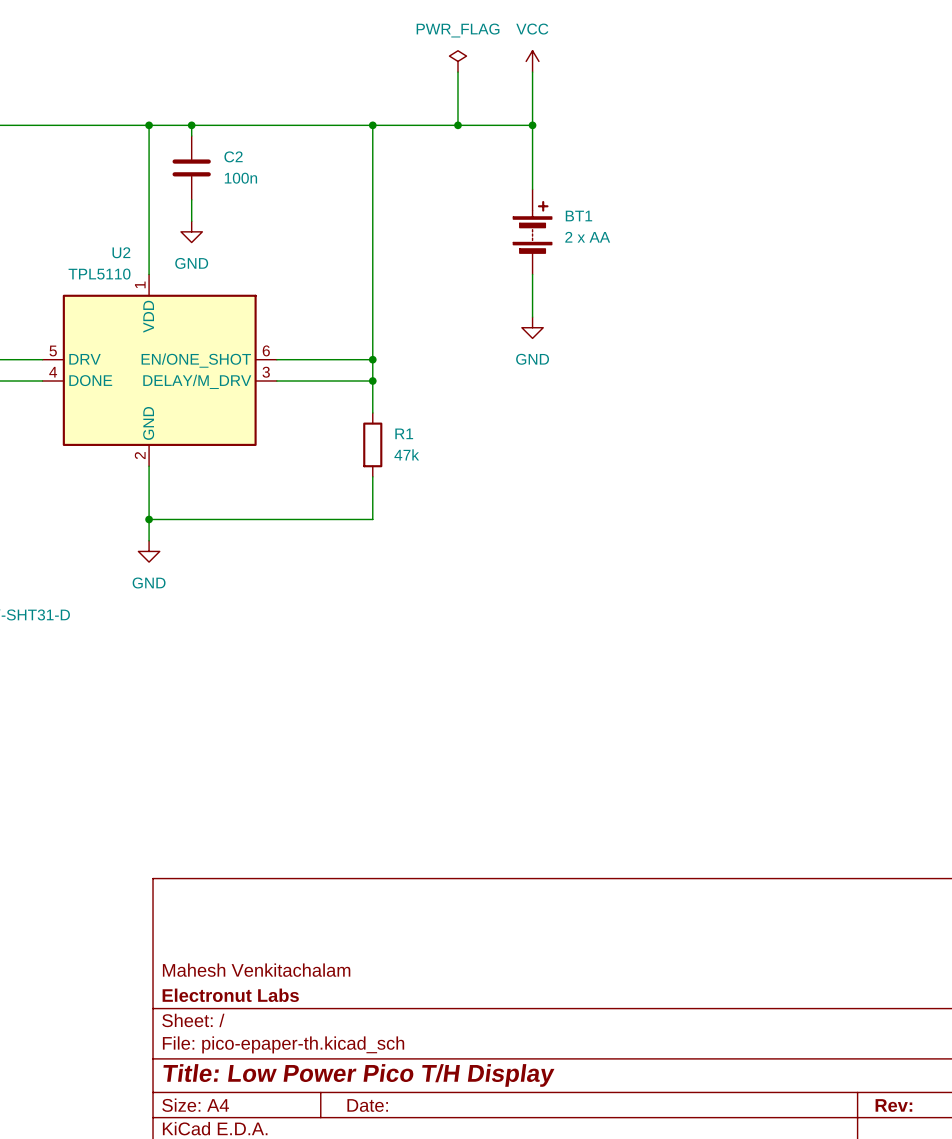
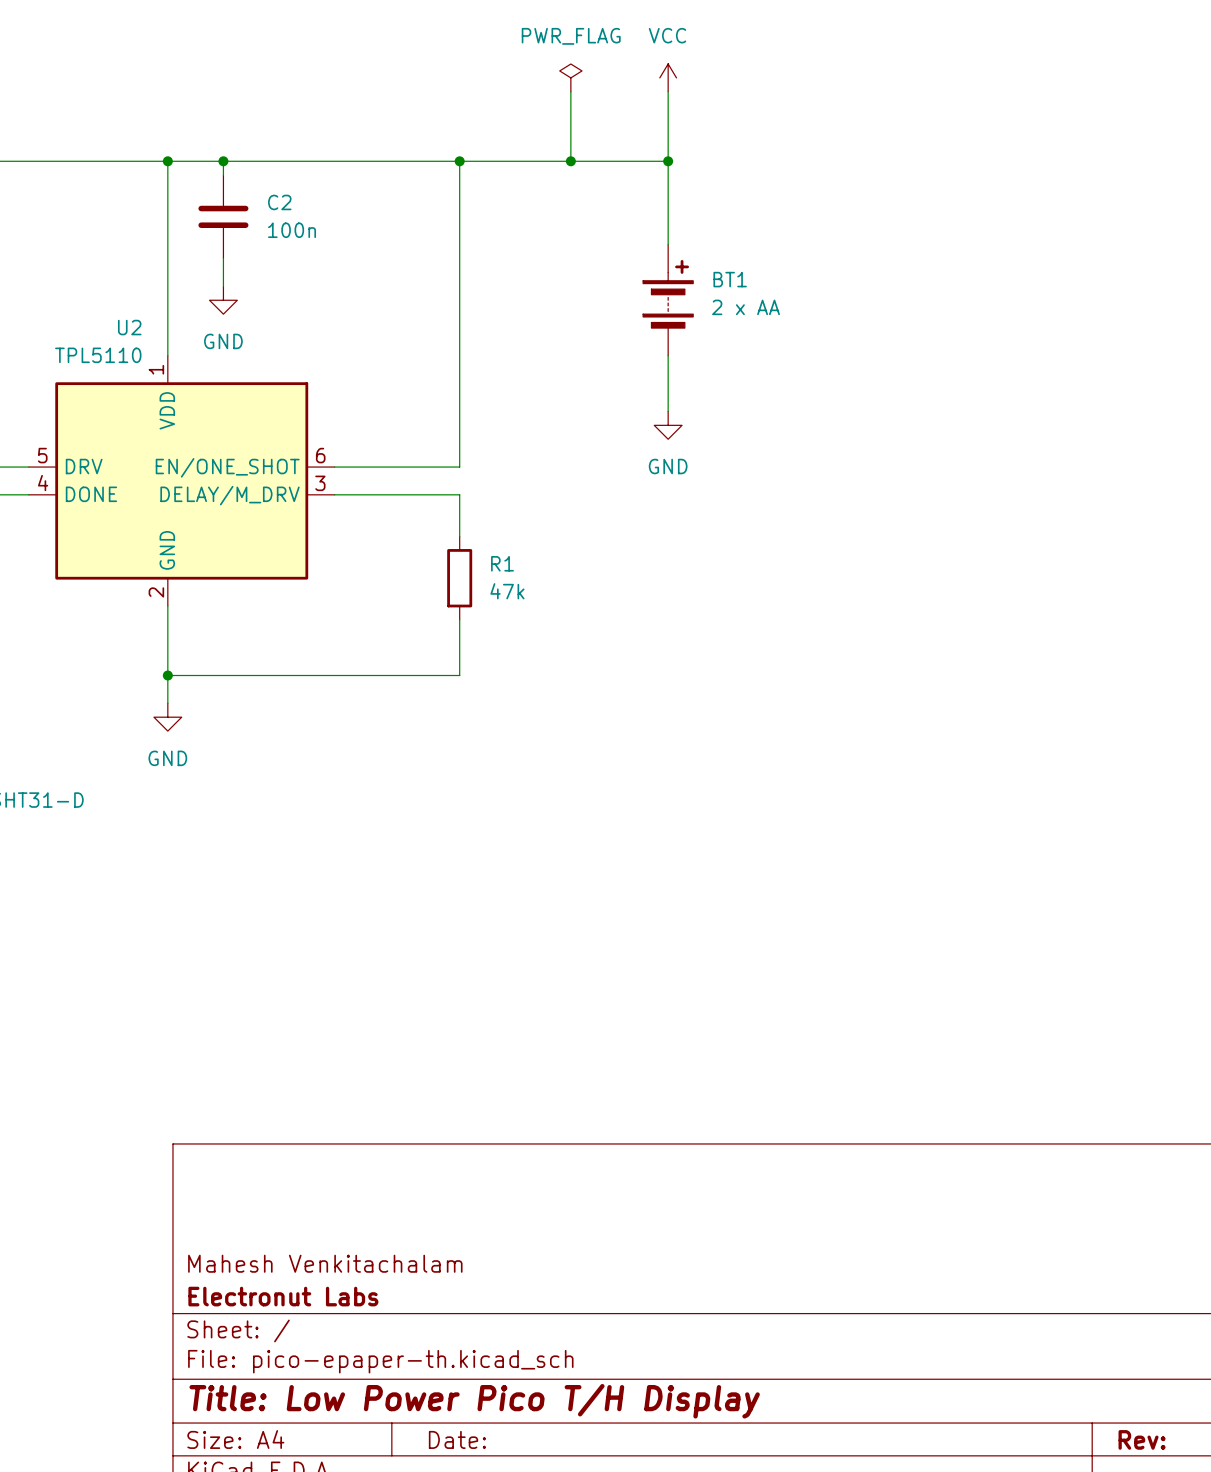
wire: (372, 359) (372, 381) -> none
junction: (372, 359) -> none
junction: (372, 381) -> none

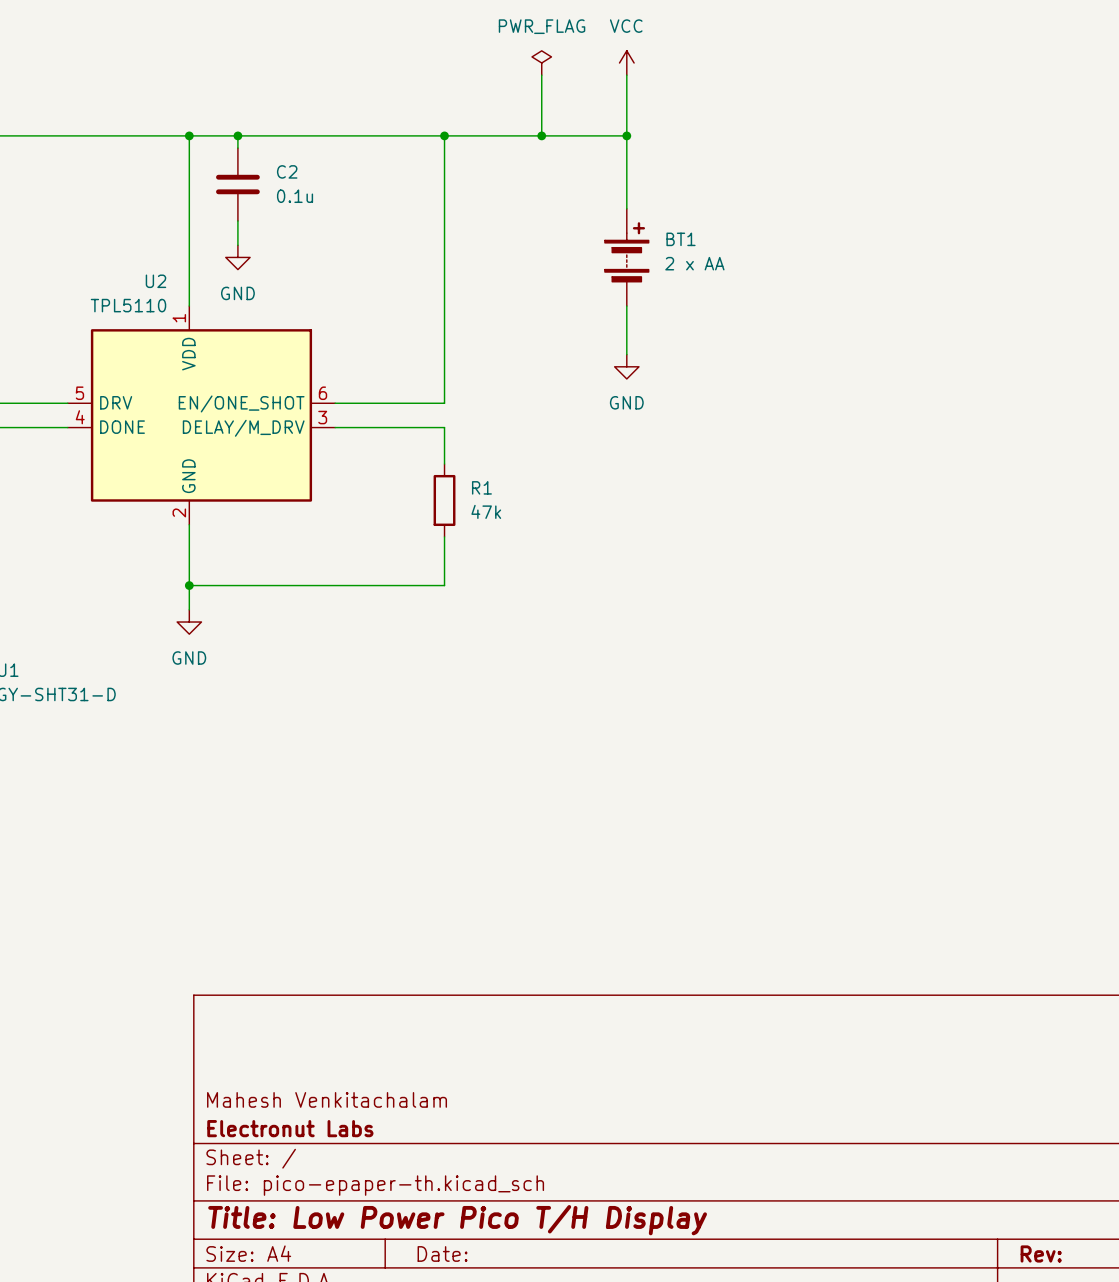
C2 value: 100n (292, 230) -> 0.1u (295, 196)

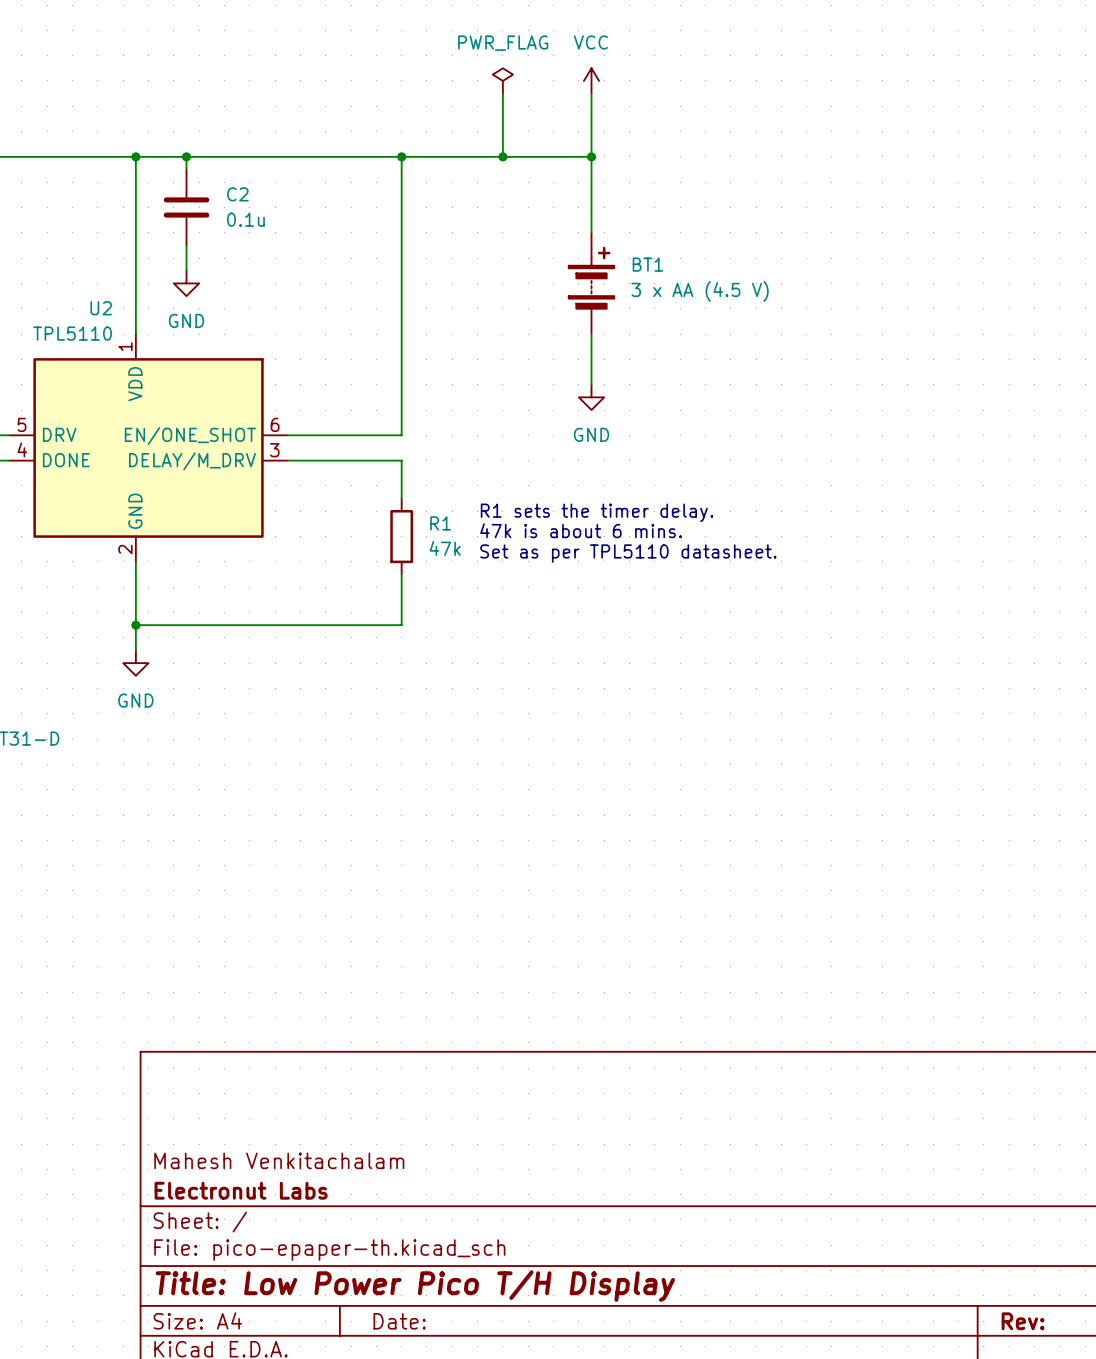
BT1 value: 2 x AA (694, 263) -> 3 x AA (4.5 V) (700, 291)
text: none -> R1 sets the timer delay. (597, 512)
text: none -> 47k is about 6 mins. (581, 530)
text: none -> Set as per TPL5110 datasheet. (628, 553)

